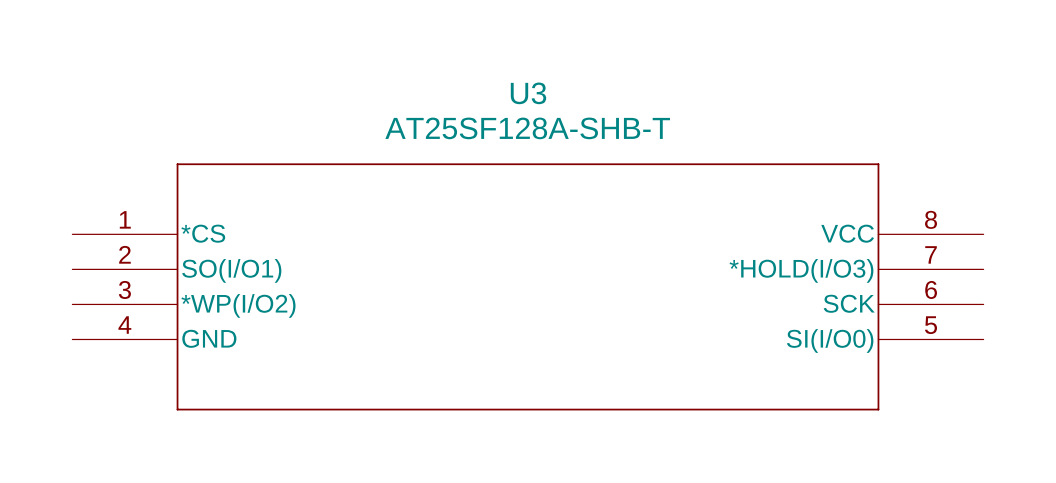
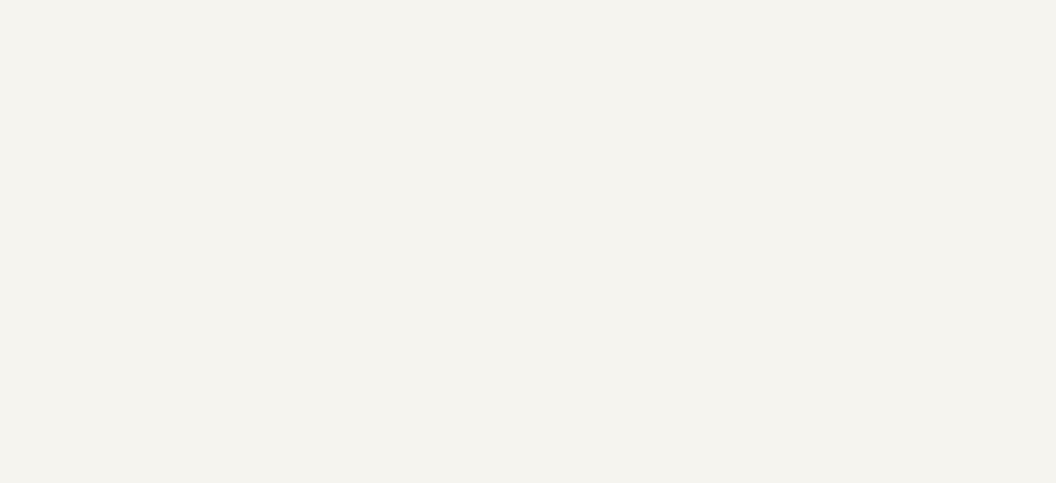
U3: AT25SF128A-SHB-T (527, 286) -> none

